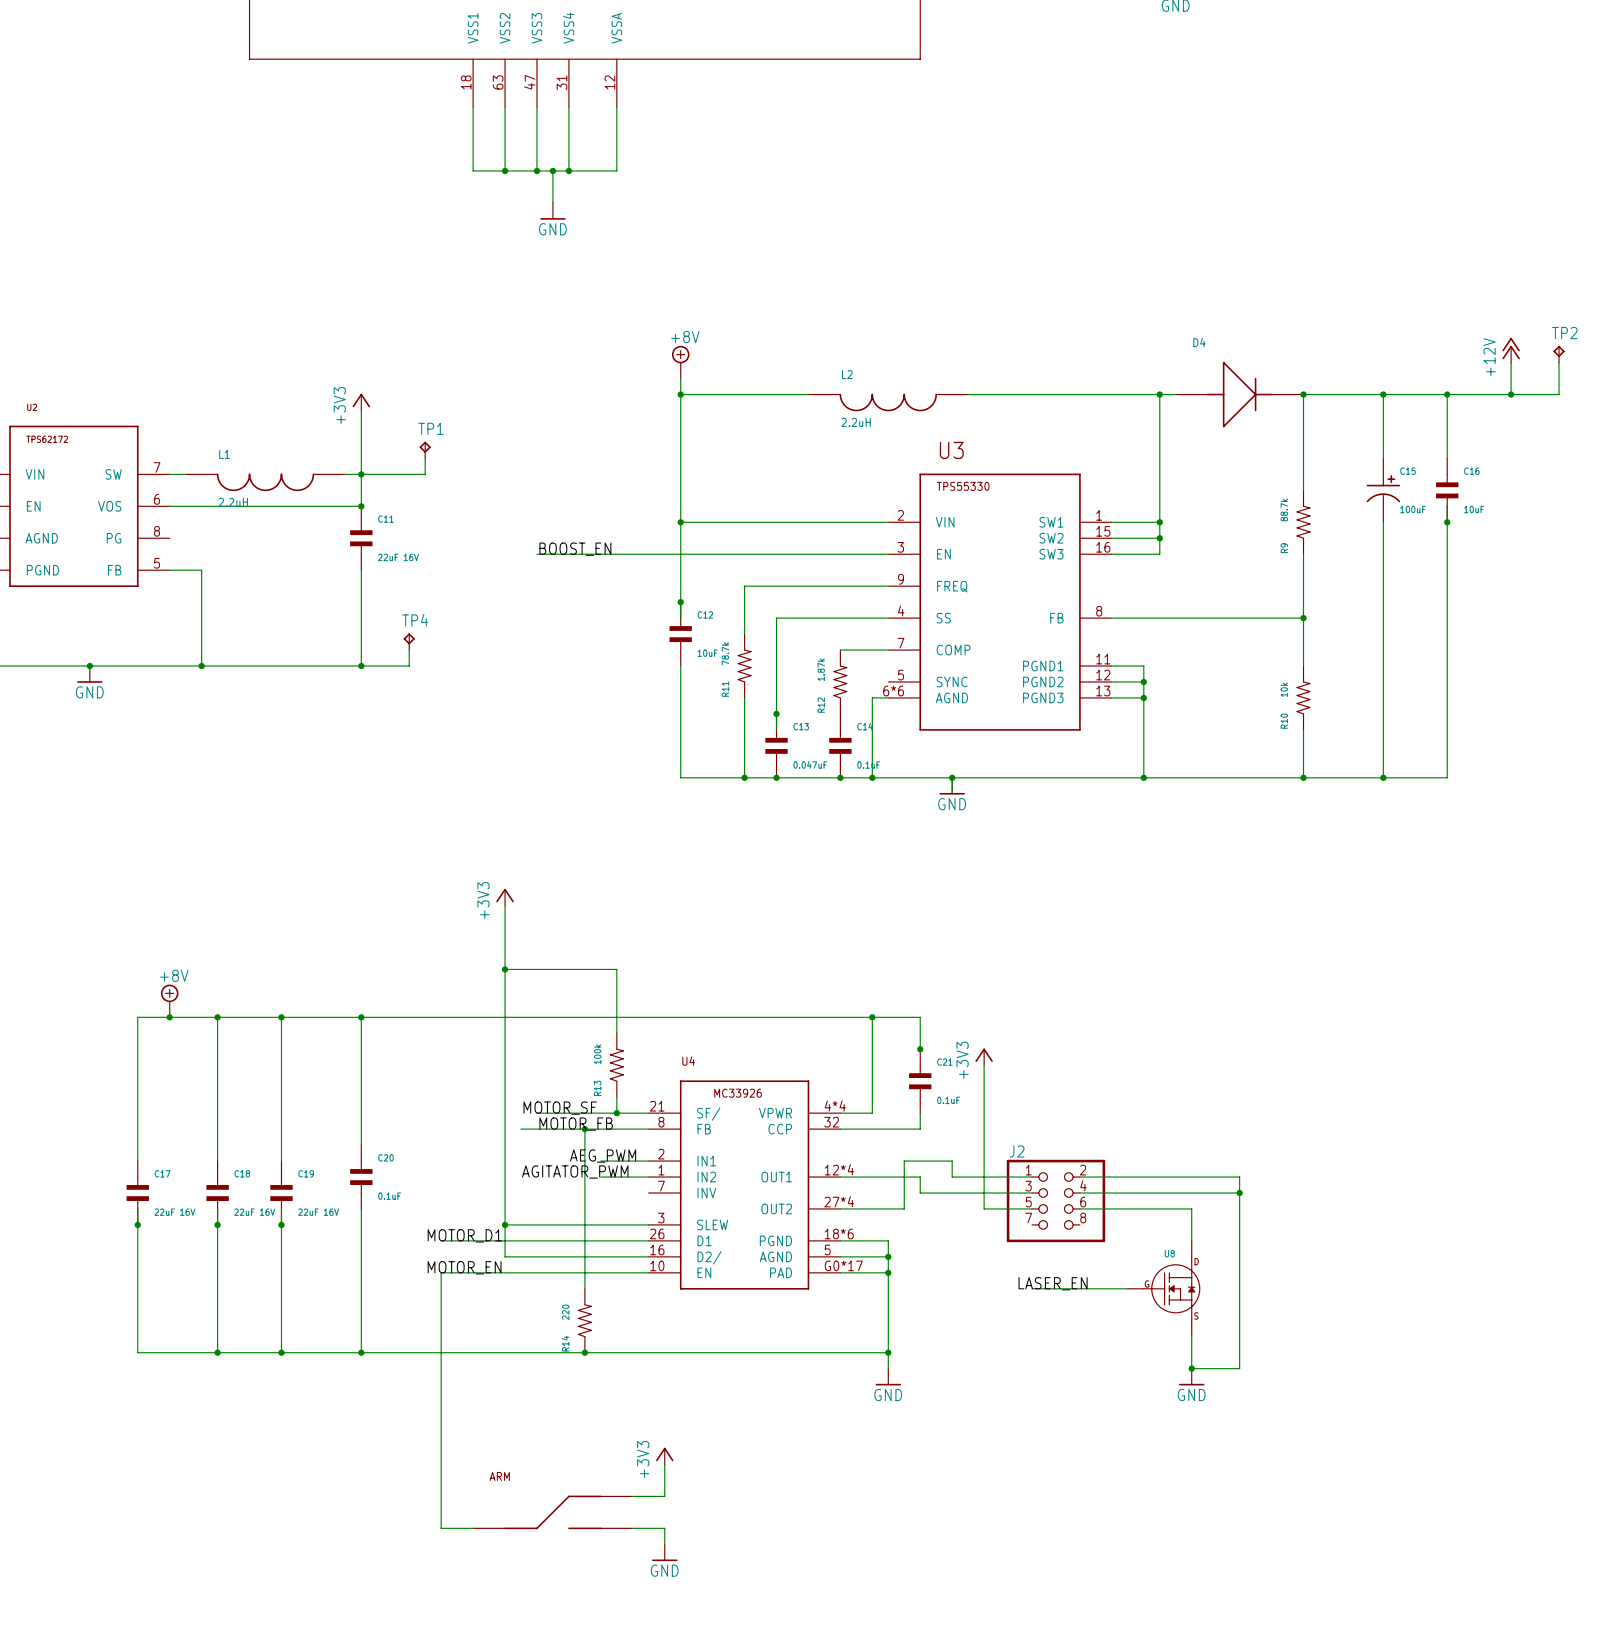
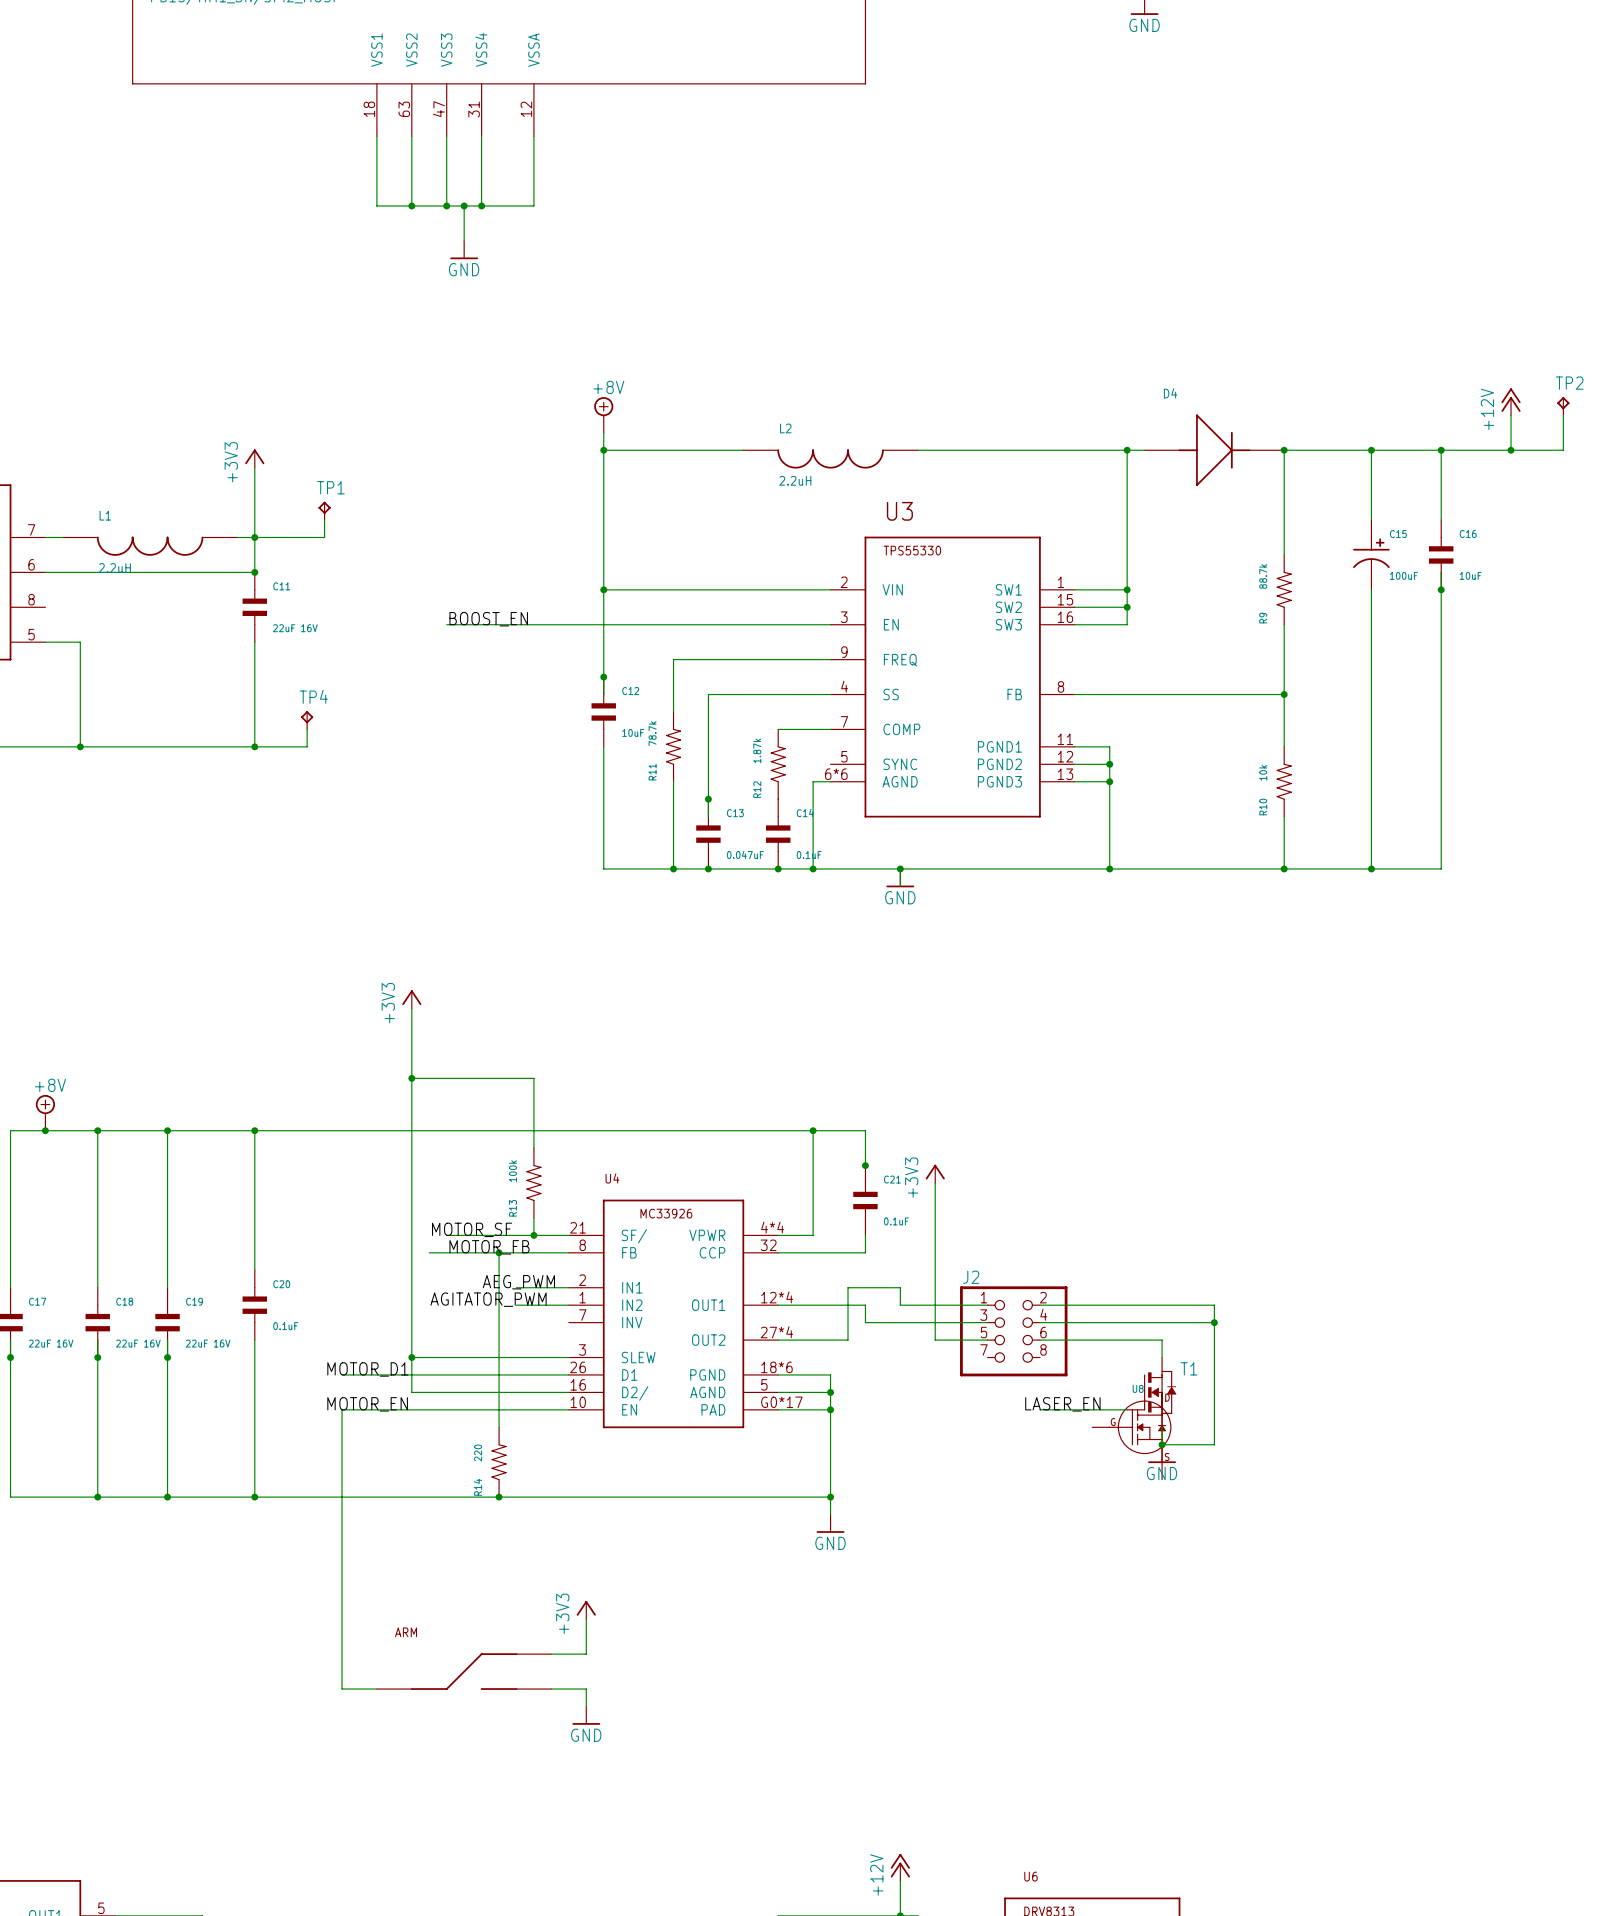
T1: none -> (1151, 1392)
wire: none -> (1039, 1409) (1127, 1409)
label position: LASER_EN (1053, 1283) -> LASER_EN (1062, 1404)
wire: (1032, 1288) (1127, 1288) -> none
junction: none -> (1162, 1444)
wire: (1239, 1304) (1239, 1368) (1191, 1368) (1191, 1336) -> (1214, 1444) (1162, 1444) (1162, 1427)
junction: (1191, 1368) -> none
power symbol position: GND (1191, 1377) -> GND (1162, 1453)

